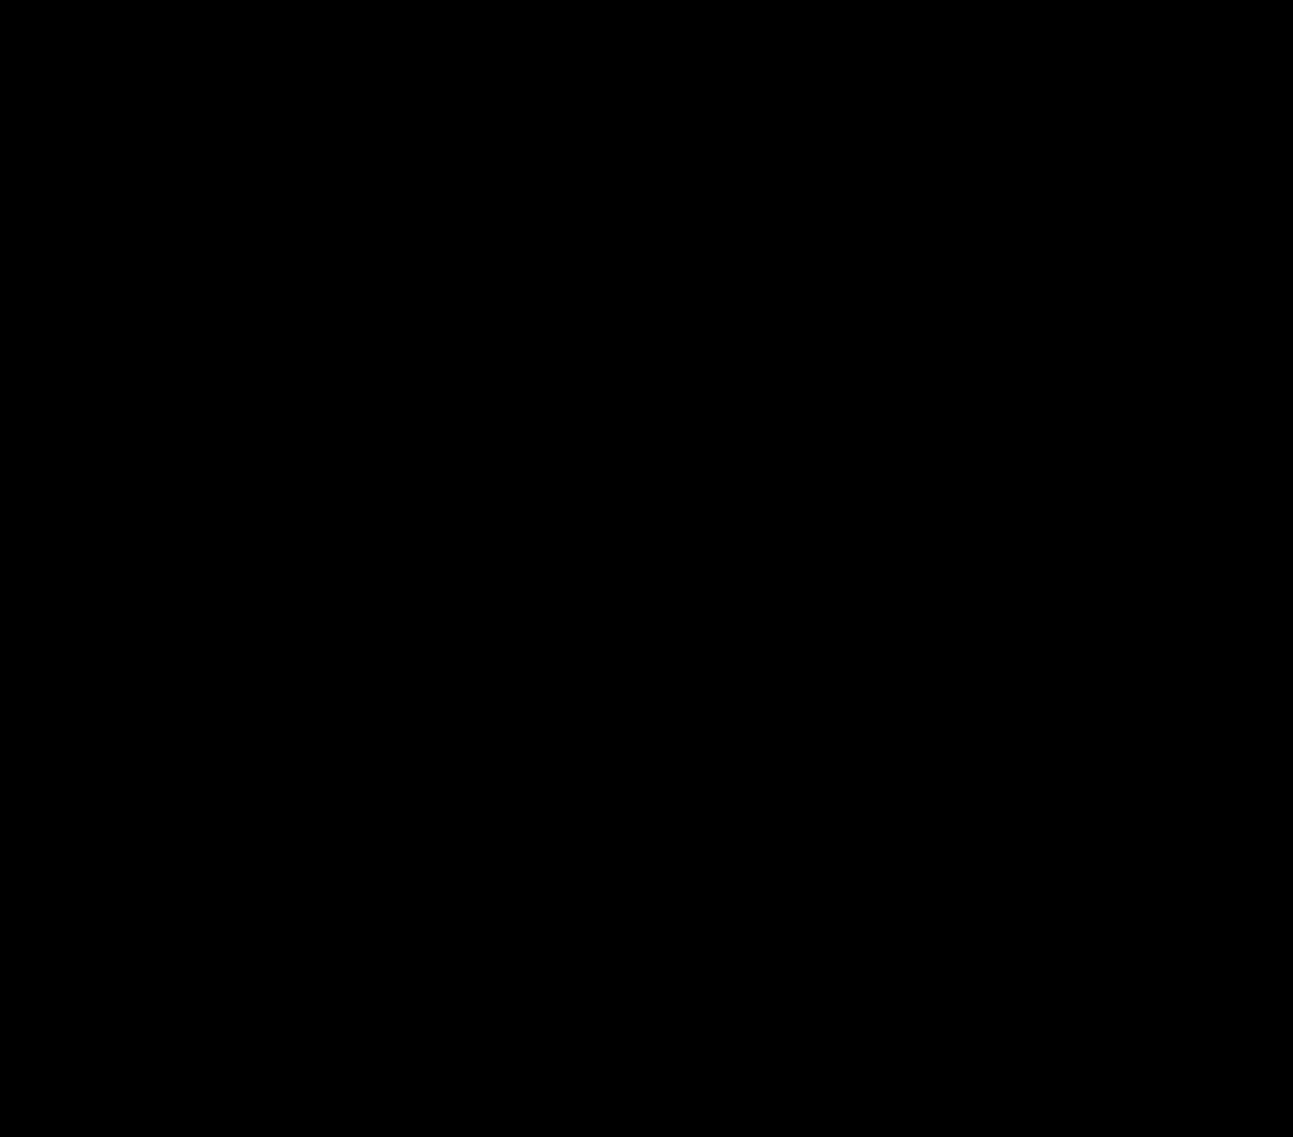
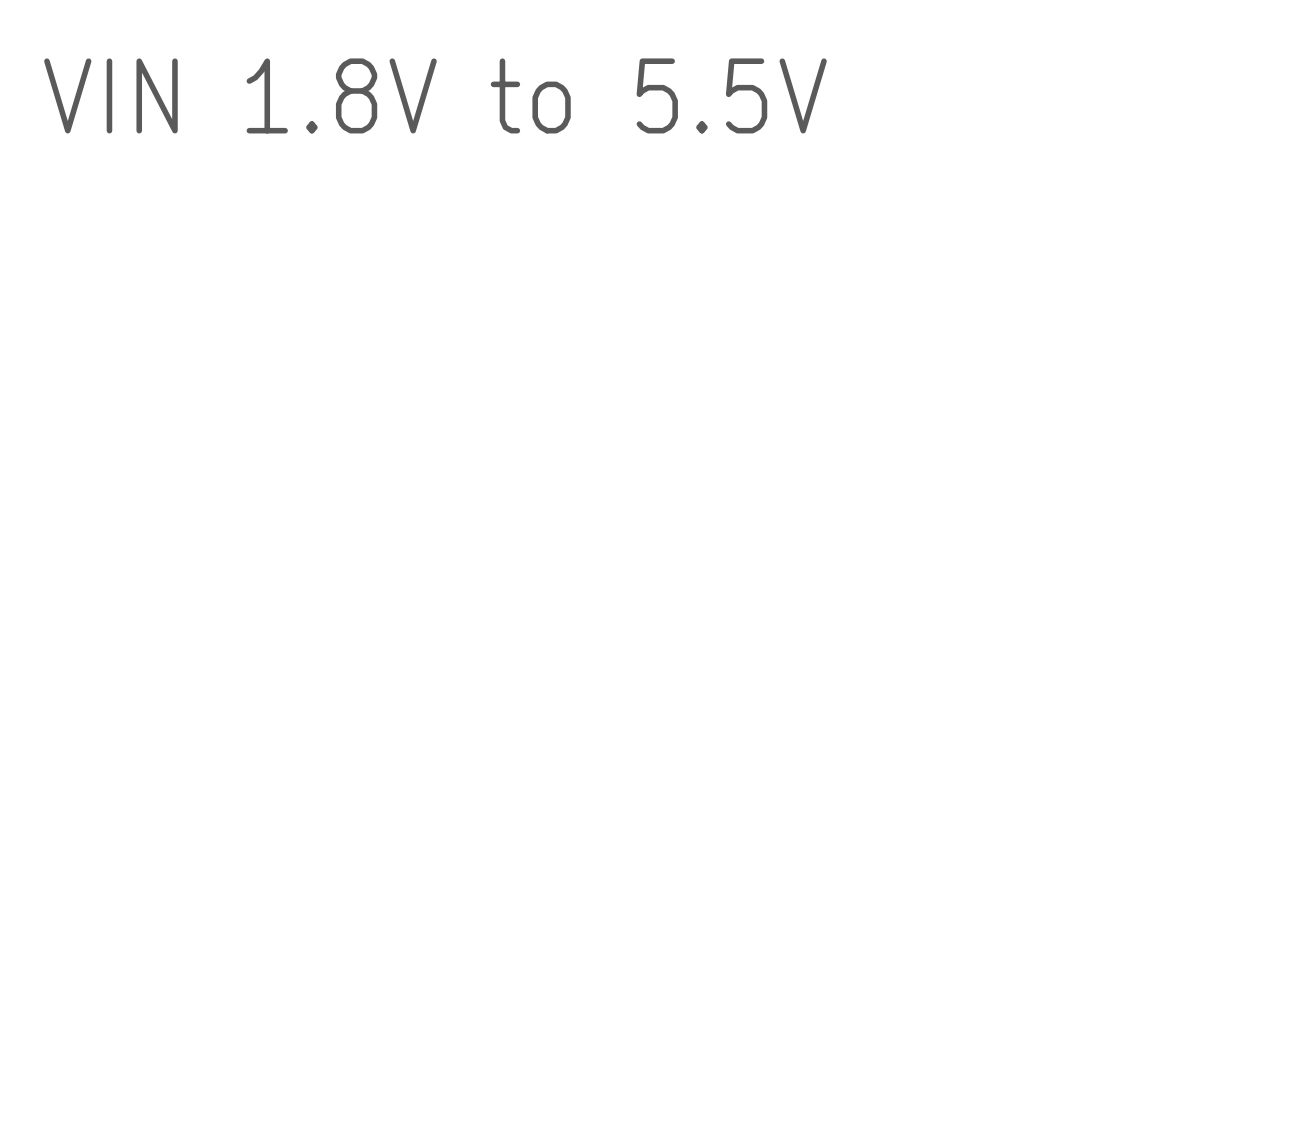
text: none -> VIN 1.8V to 5.5V (435, 95)

